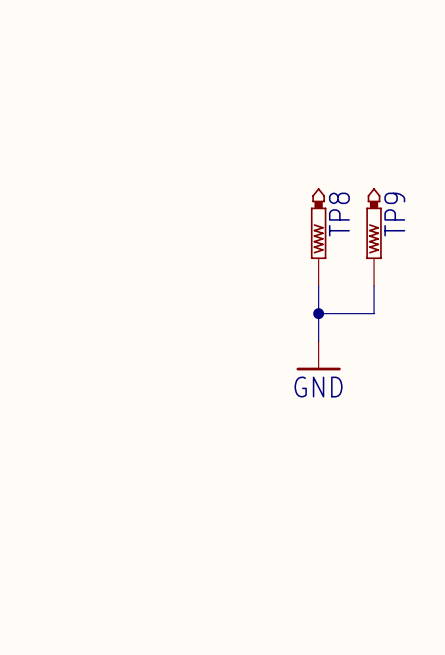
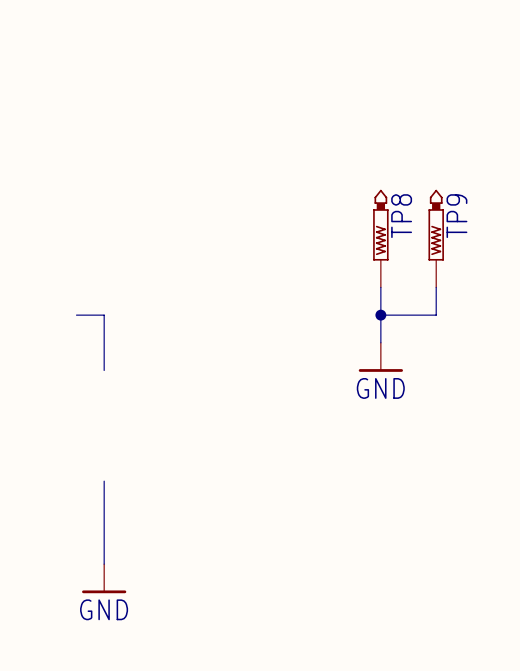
wire: none -> (76, 315) (104, 315) (104, 370)
wire: none -> (104, 481) (104, 564)
power symbol: none -> GND (104, 578)

